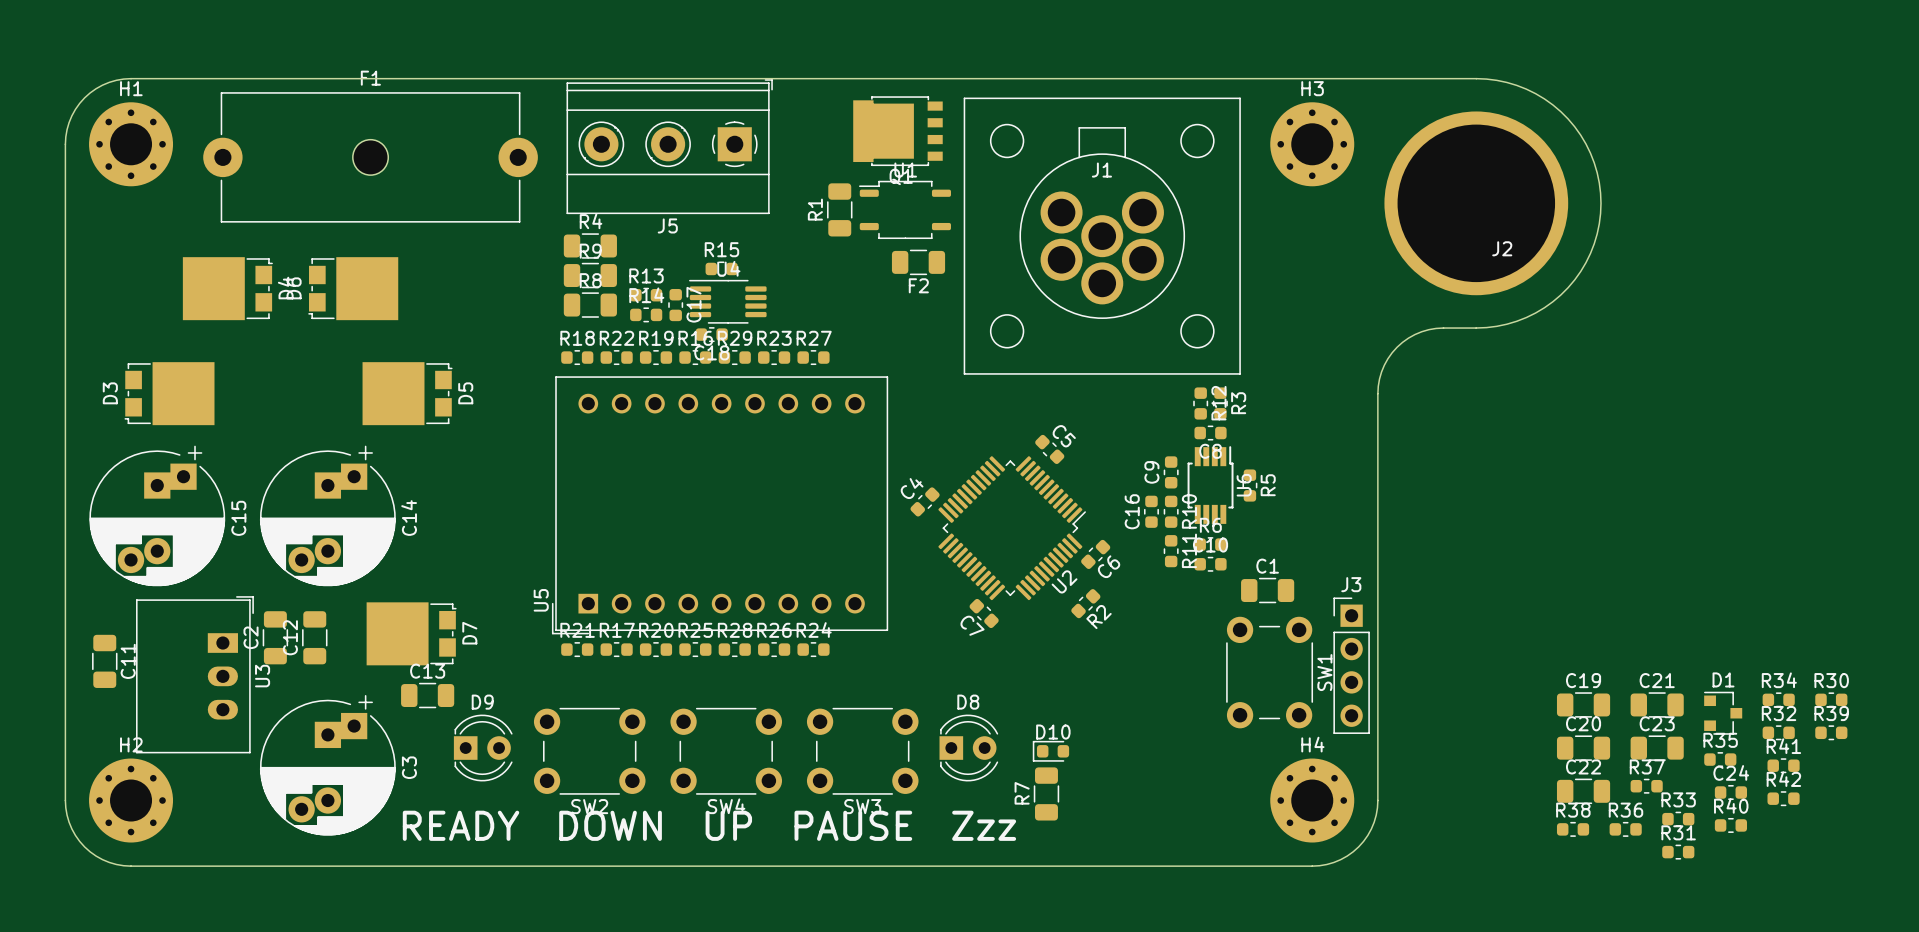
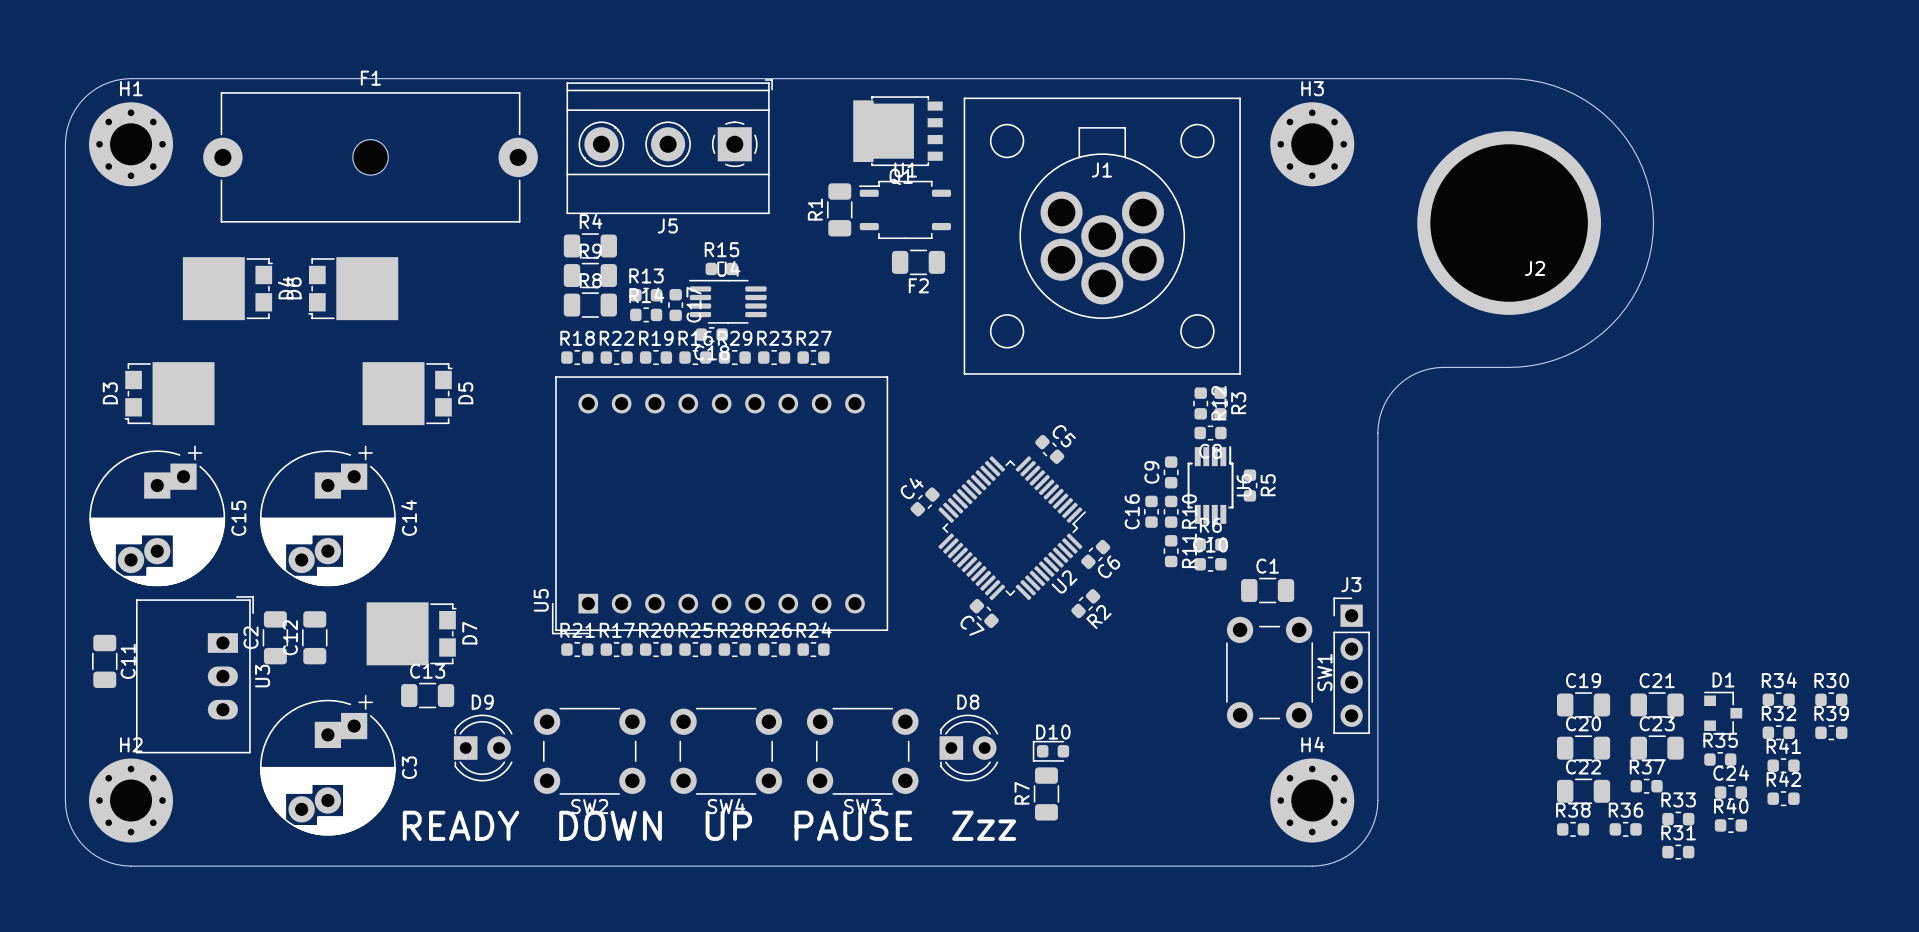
board edge: (1476, 78) (1506, 82) (1535, 93) (1552, 104) (1574, 126) (1590, 153) (1599, 182) (1600, 203) (1597, 233) (1590, 253) (1574, 279) (1552, 301) (1535, 313) (1516, 321) (1496, 326) (1428, 329) (1408, 338) (1397, 347) (1384, 365) (1379, 379) (1377, 433) -> (1476, 78) (1520, 79) (1553, 85) (1584, 99) (1611, 120) (1625, 138) (1637, 157) (1649, 189) (1653, 223) (1649, 256) (1637, 288) (1625, 307) (1611, 325) (1584, 346) (1564, 356) (1531, 365) (1436, 367) (1415, 373) (1397, 386) (1387, 398) (1381, 411) (1377, 433)
J2 position: (1476, 203) -> (1509, 223)

